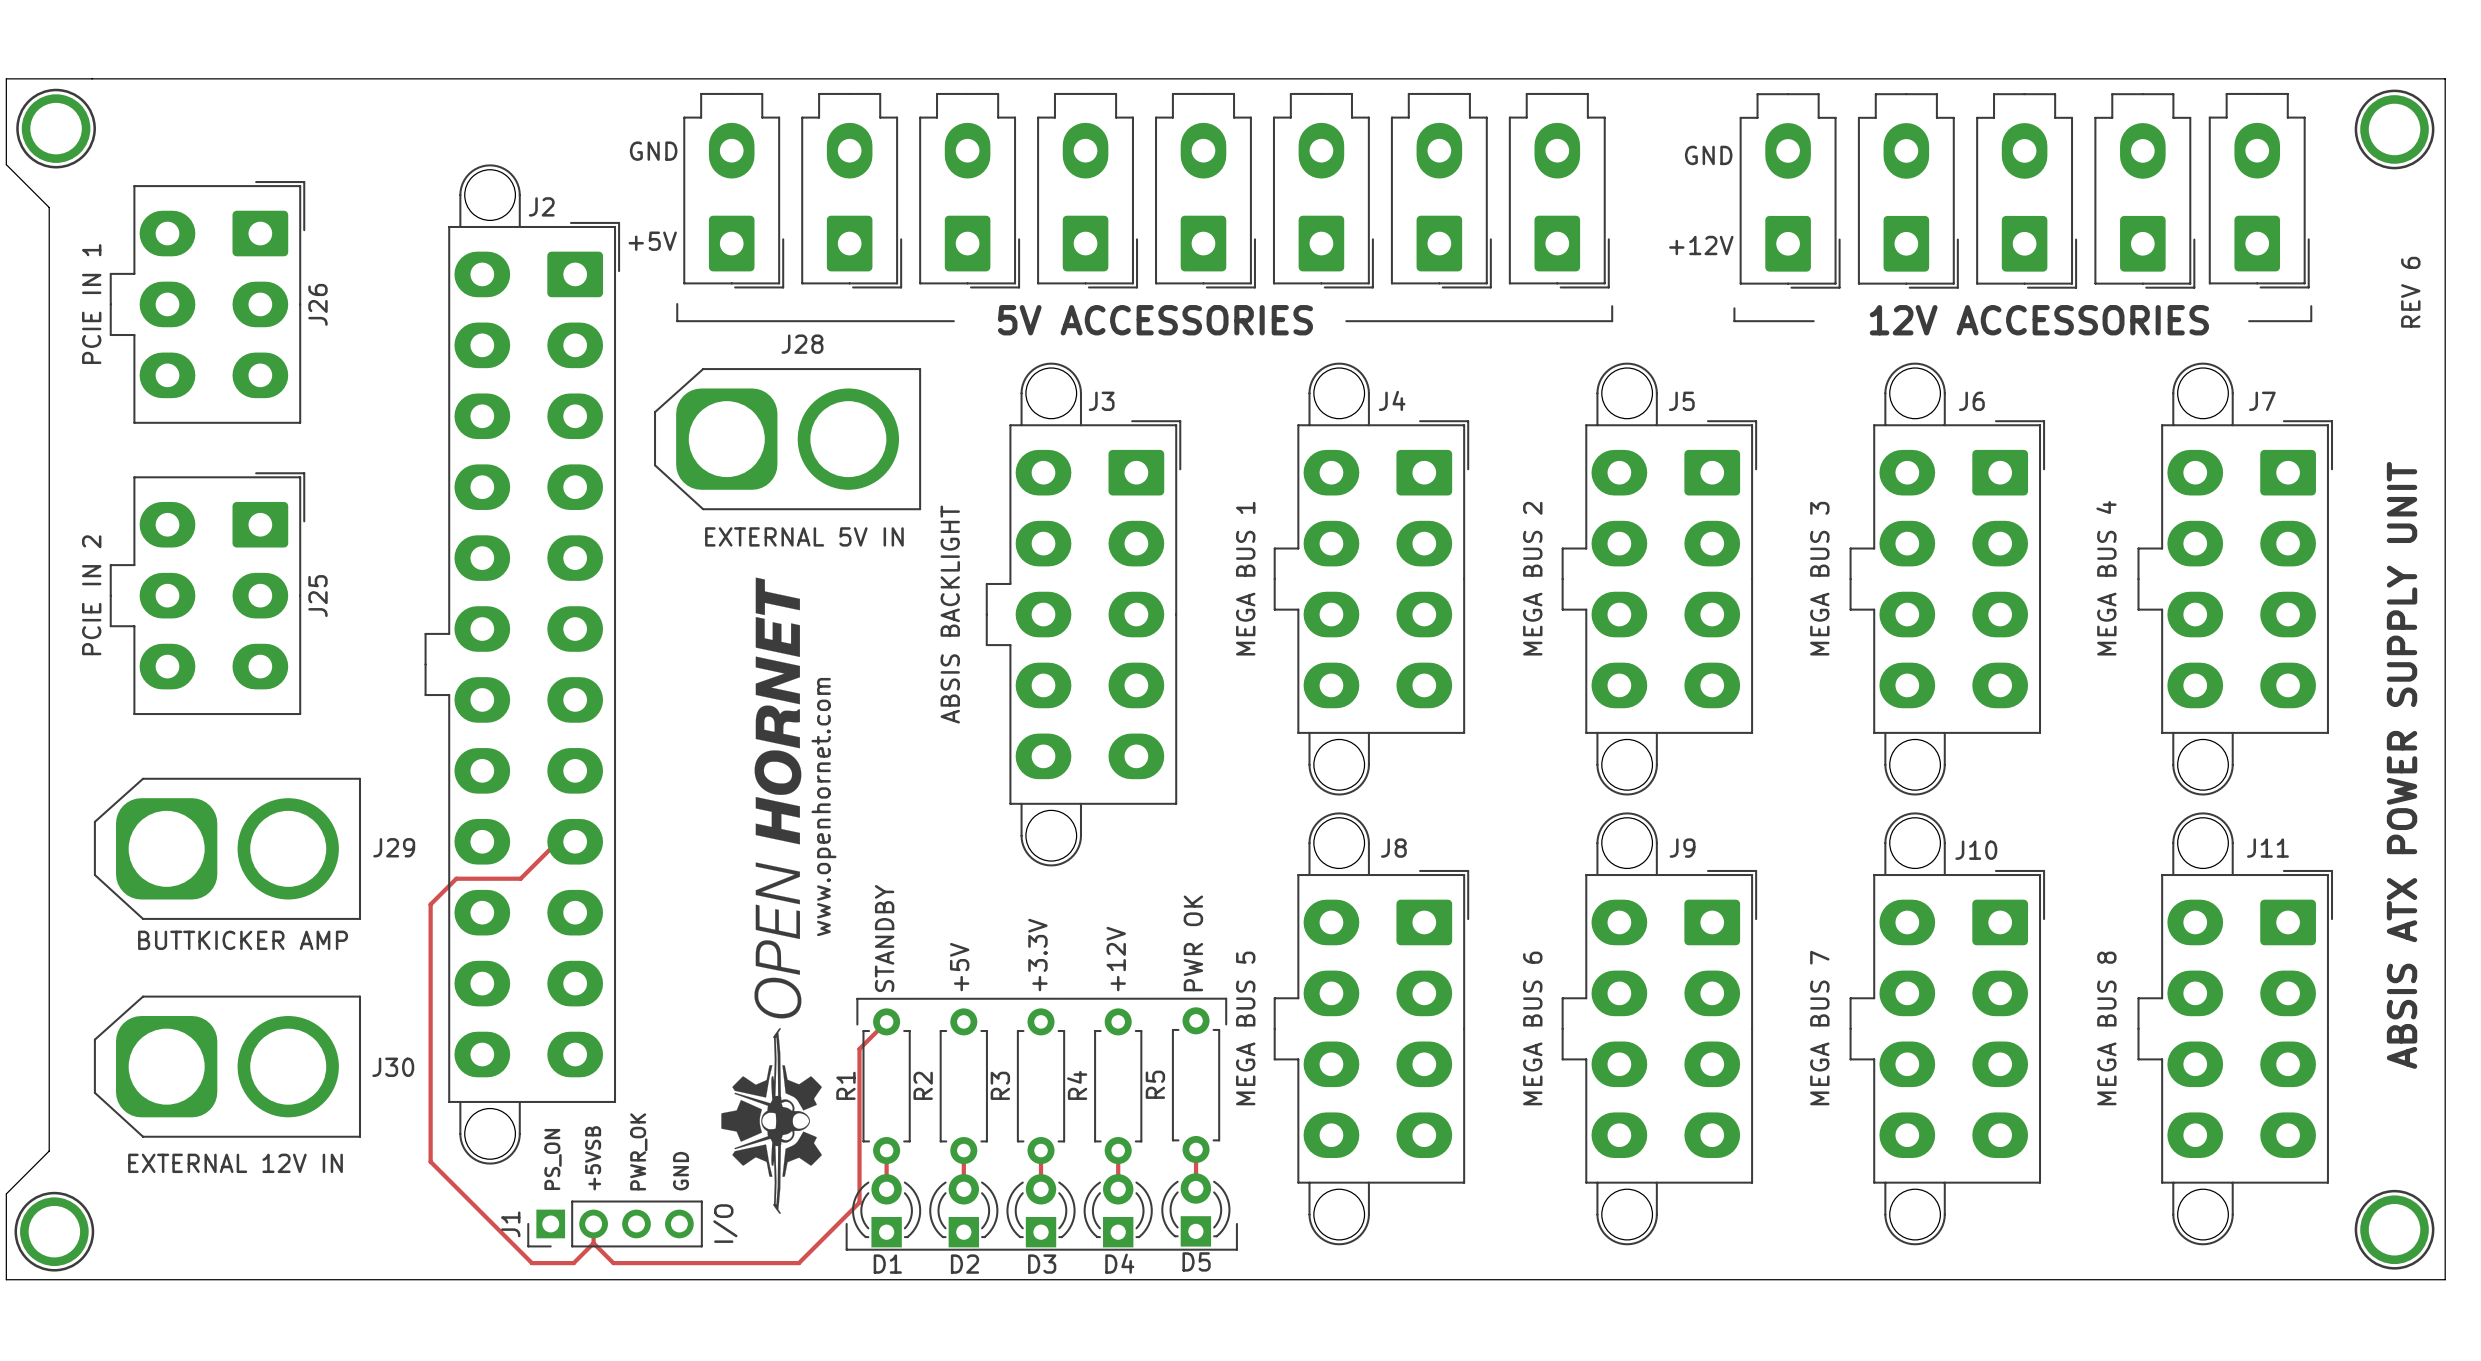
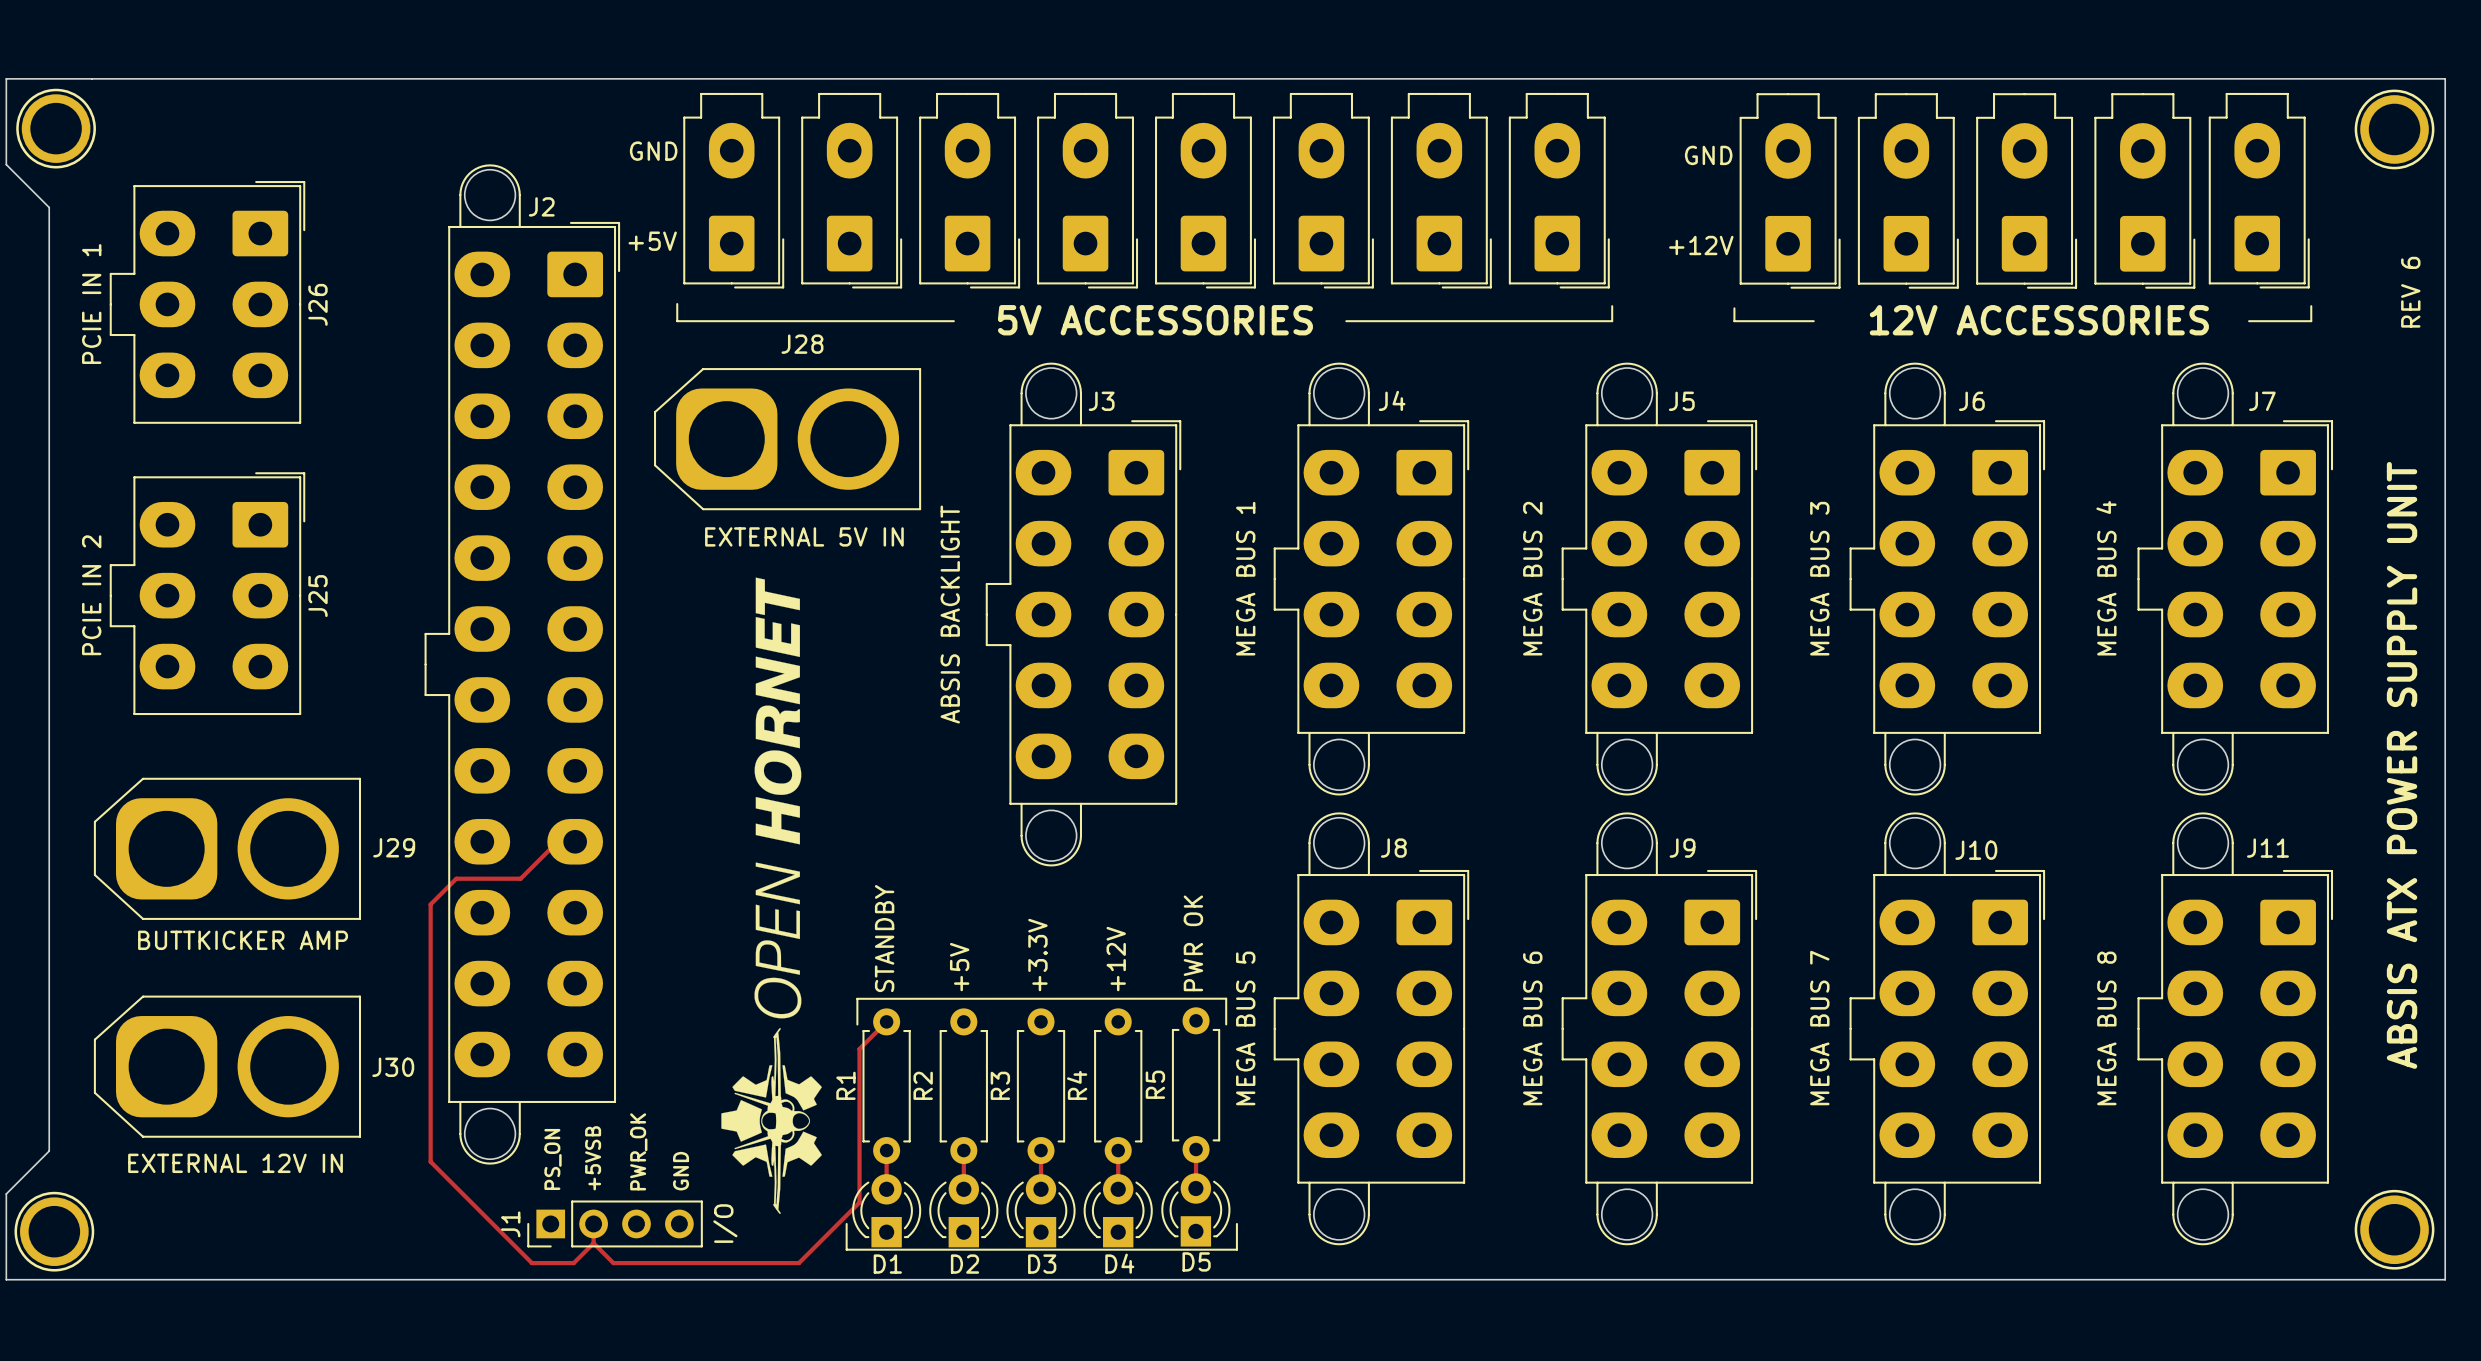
text: www.openhornet.com (823, 807) -> none

